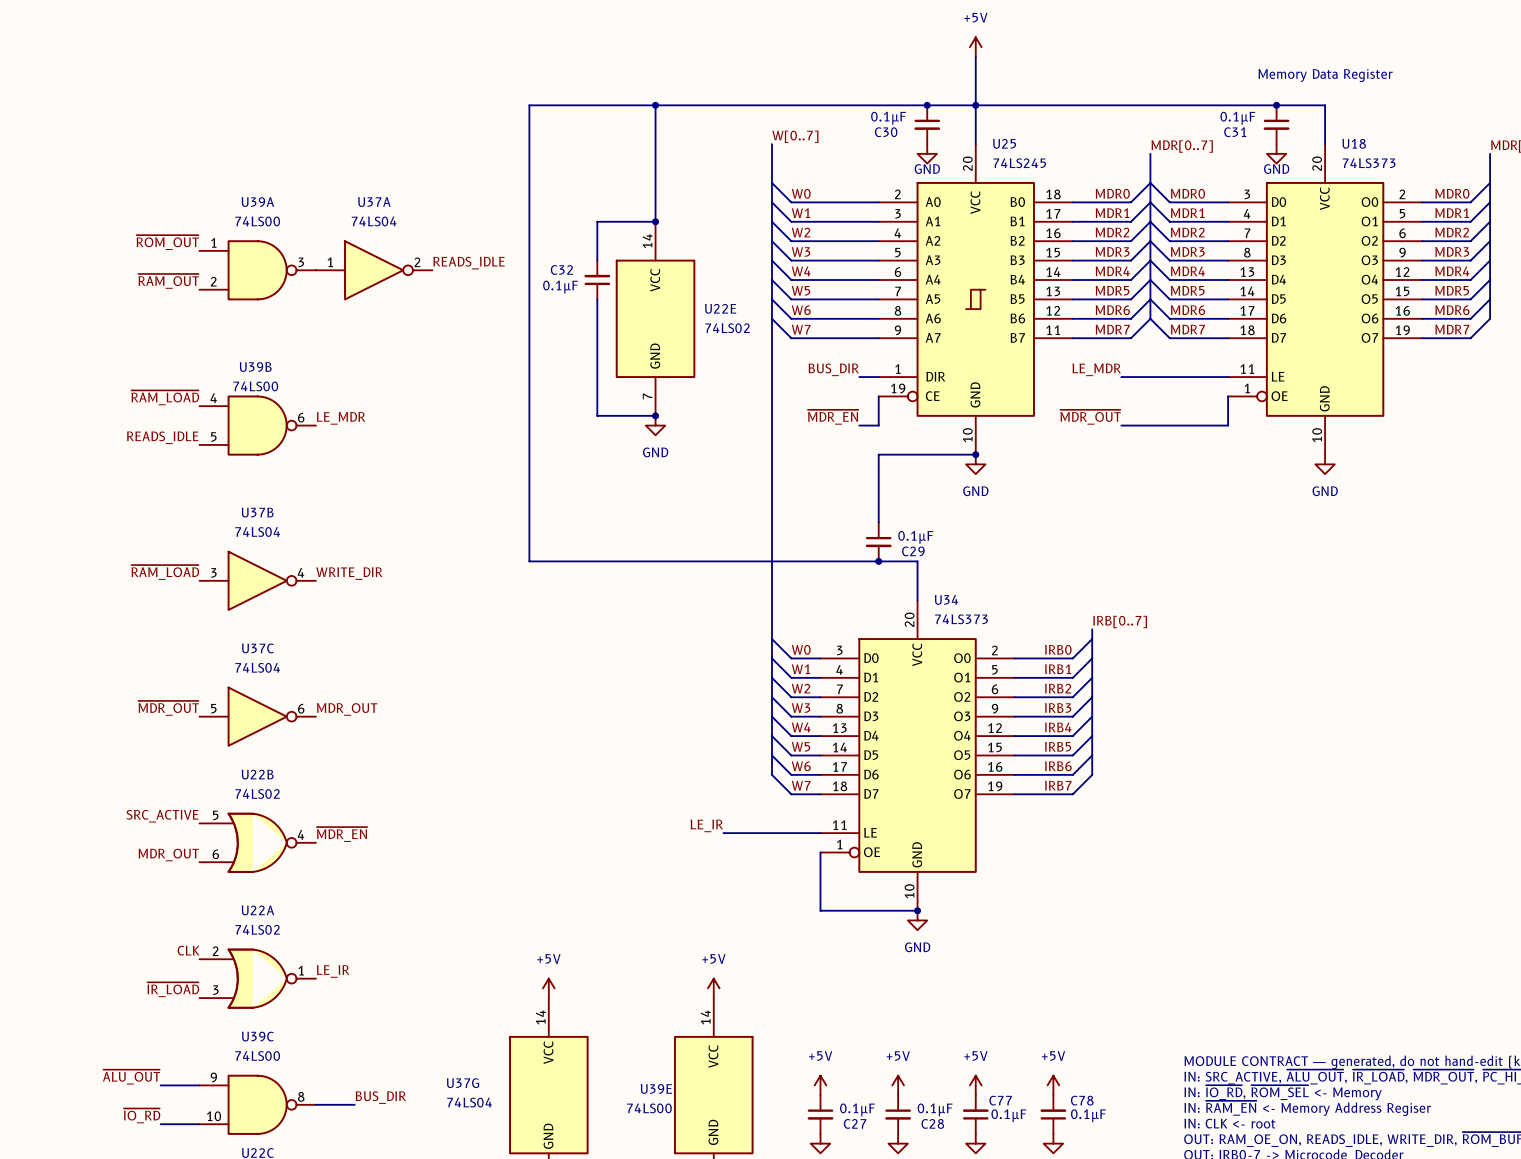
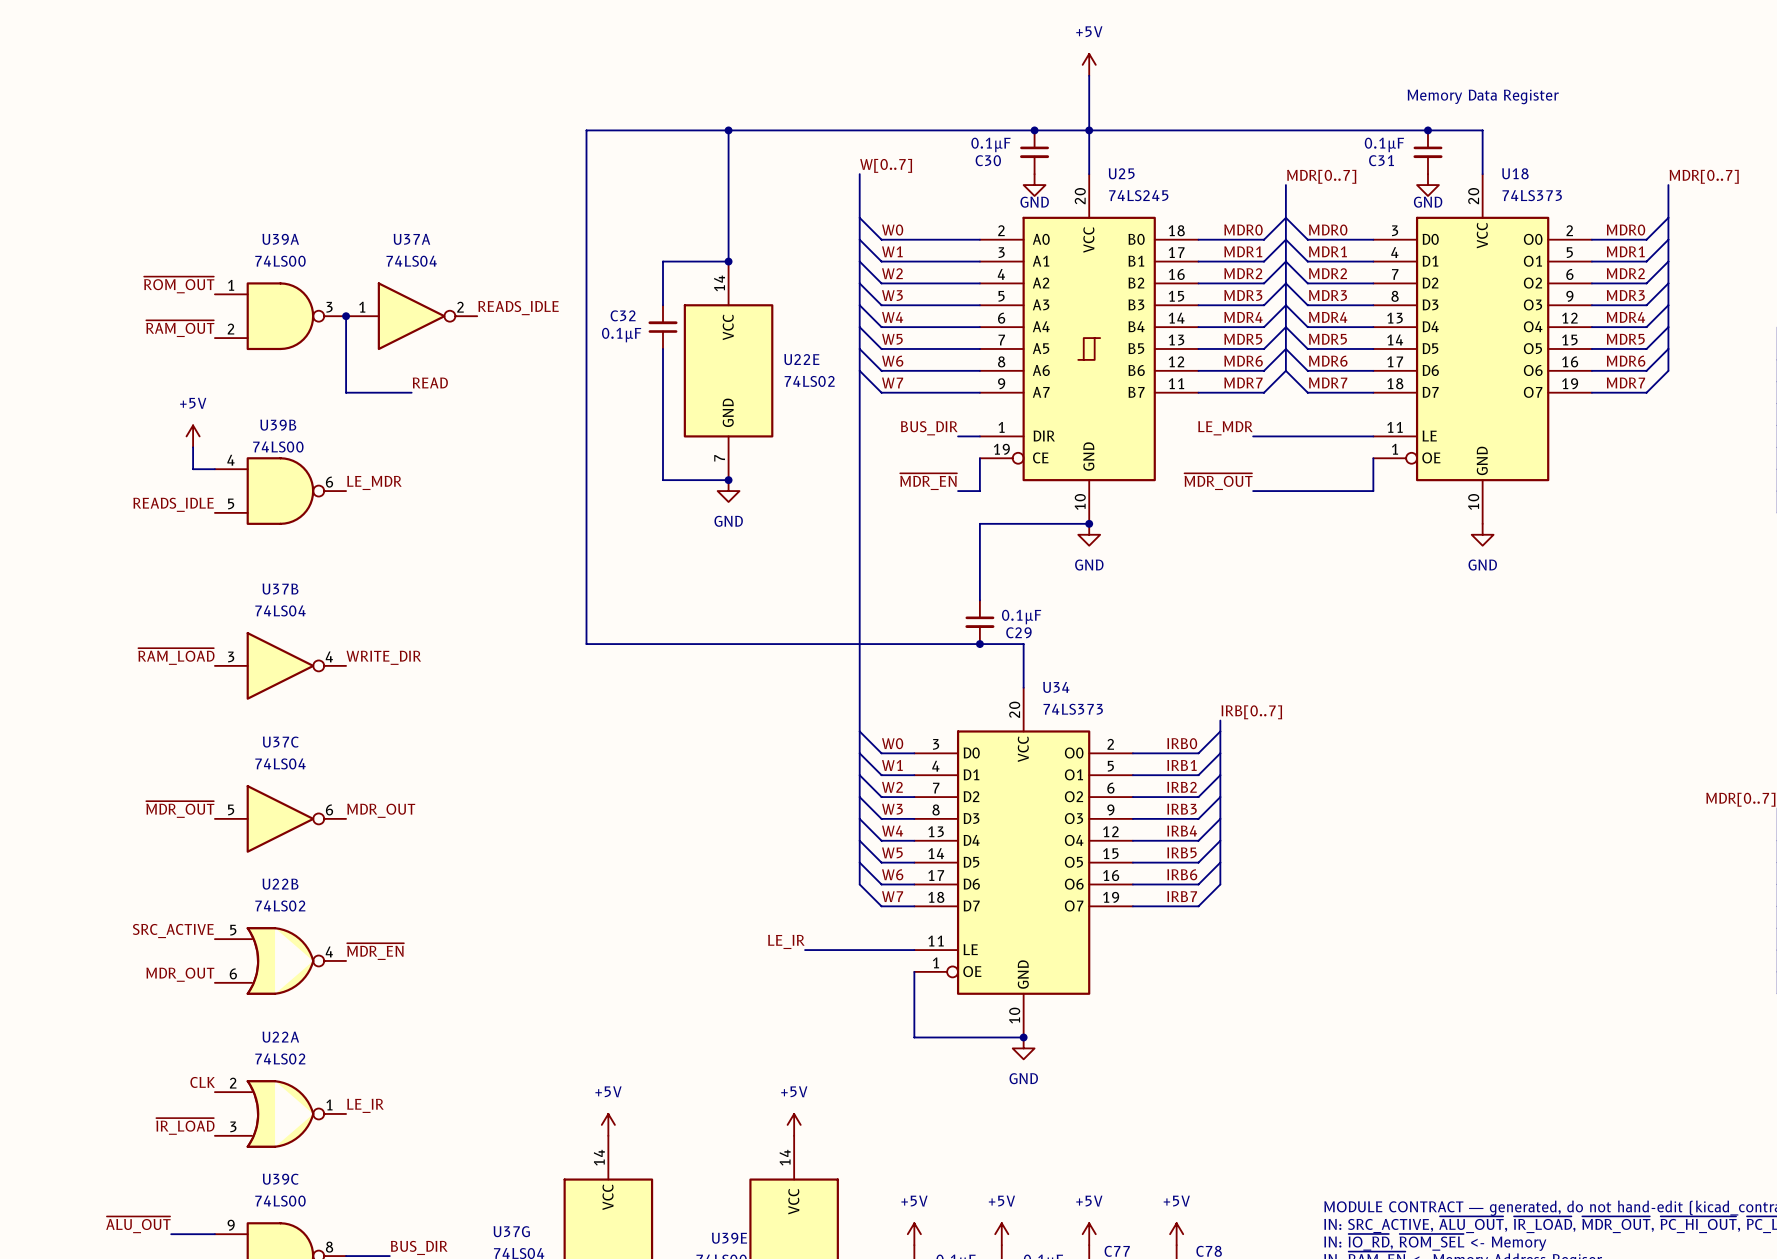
wire: none -> (346, 316) (346, 392) (411, 392)
junction: none -> (346, 316)
label: none -> READ (430, 382)
power symbol: none -> +5V (193, 436)
wire: none -> (193, 447) (193, 469) (214, 469)
label: ~{RAM_LOAD} (165, 397) -> none

